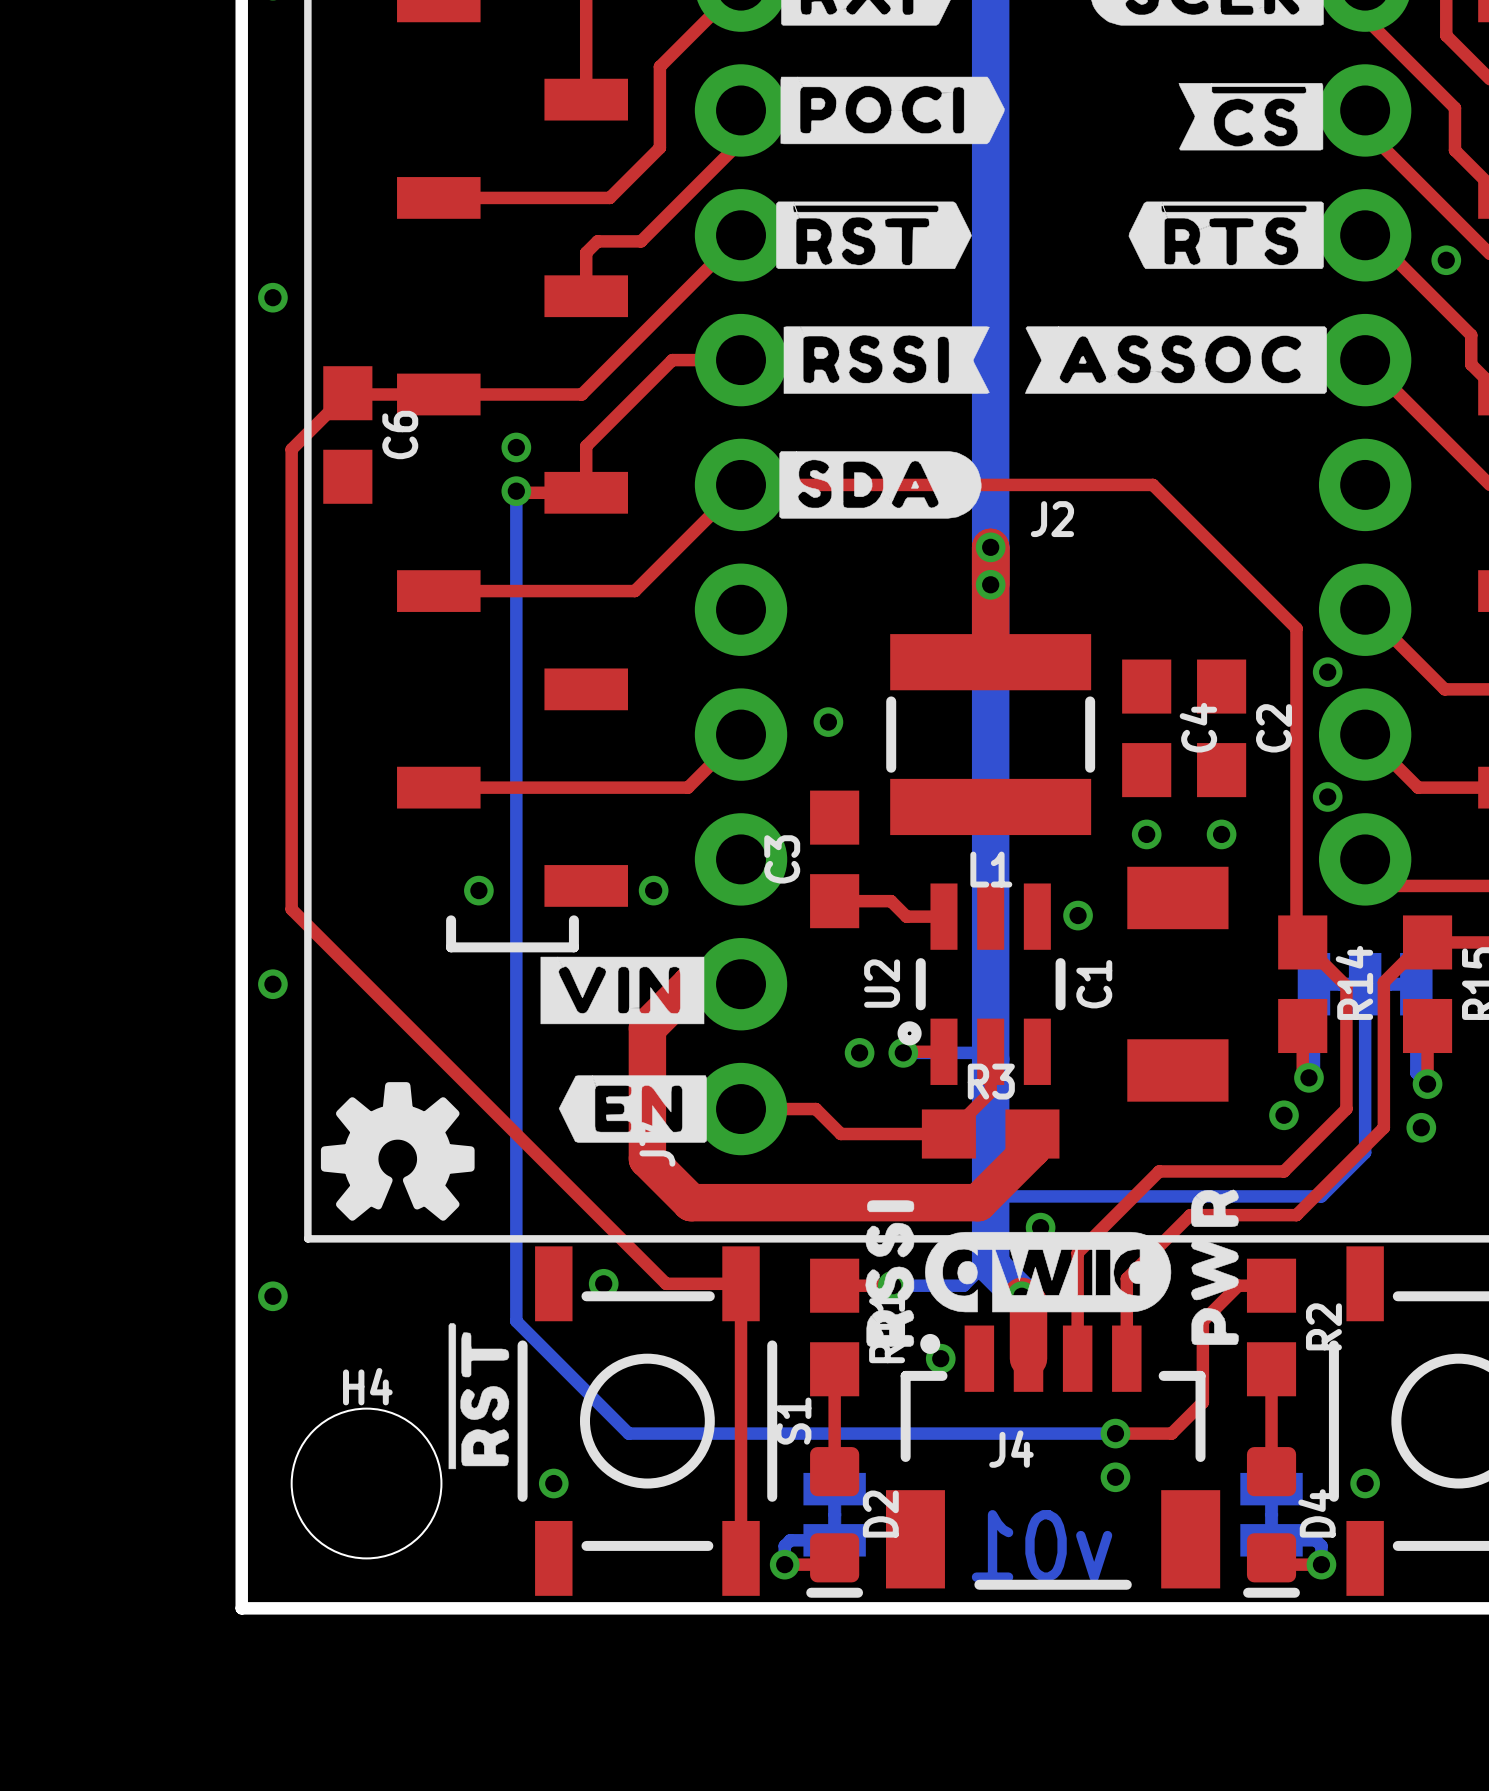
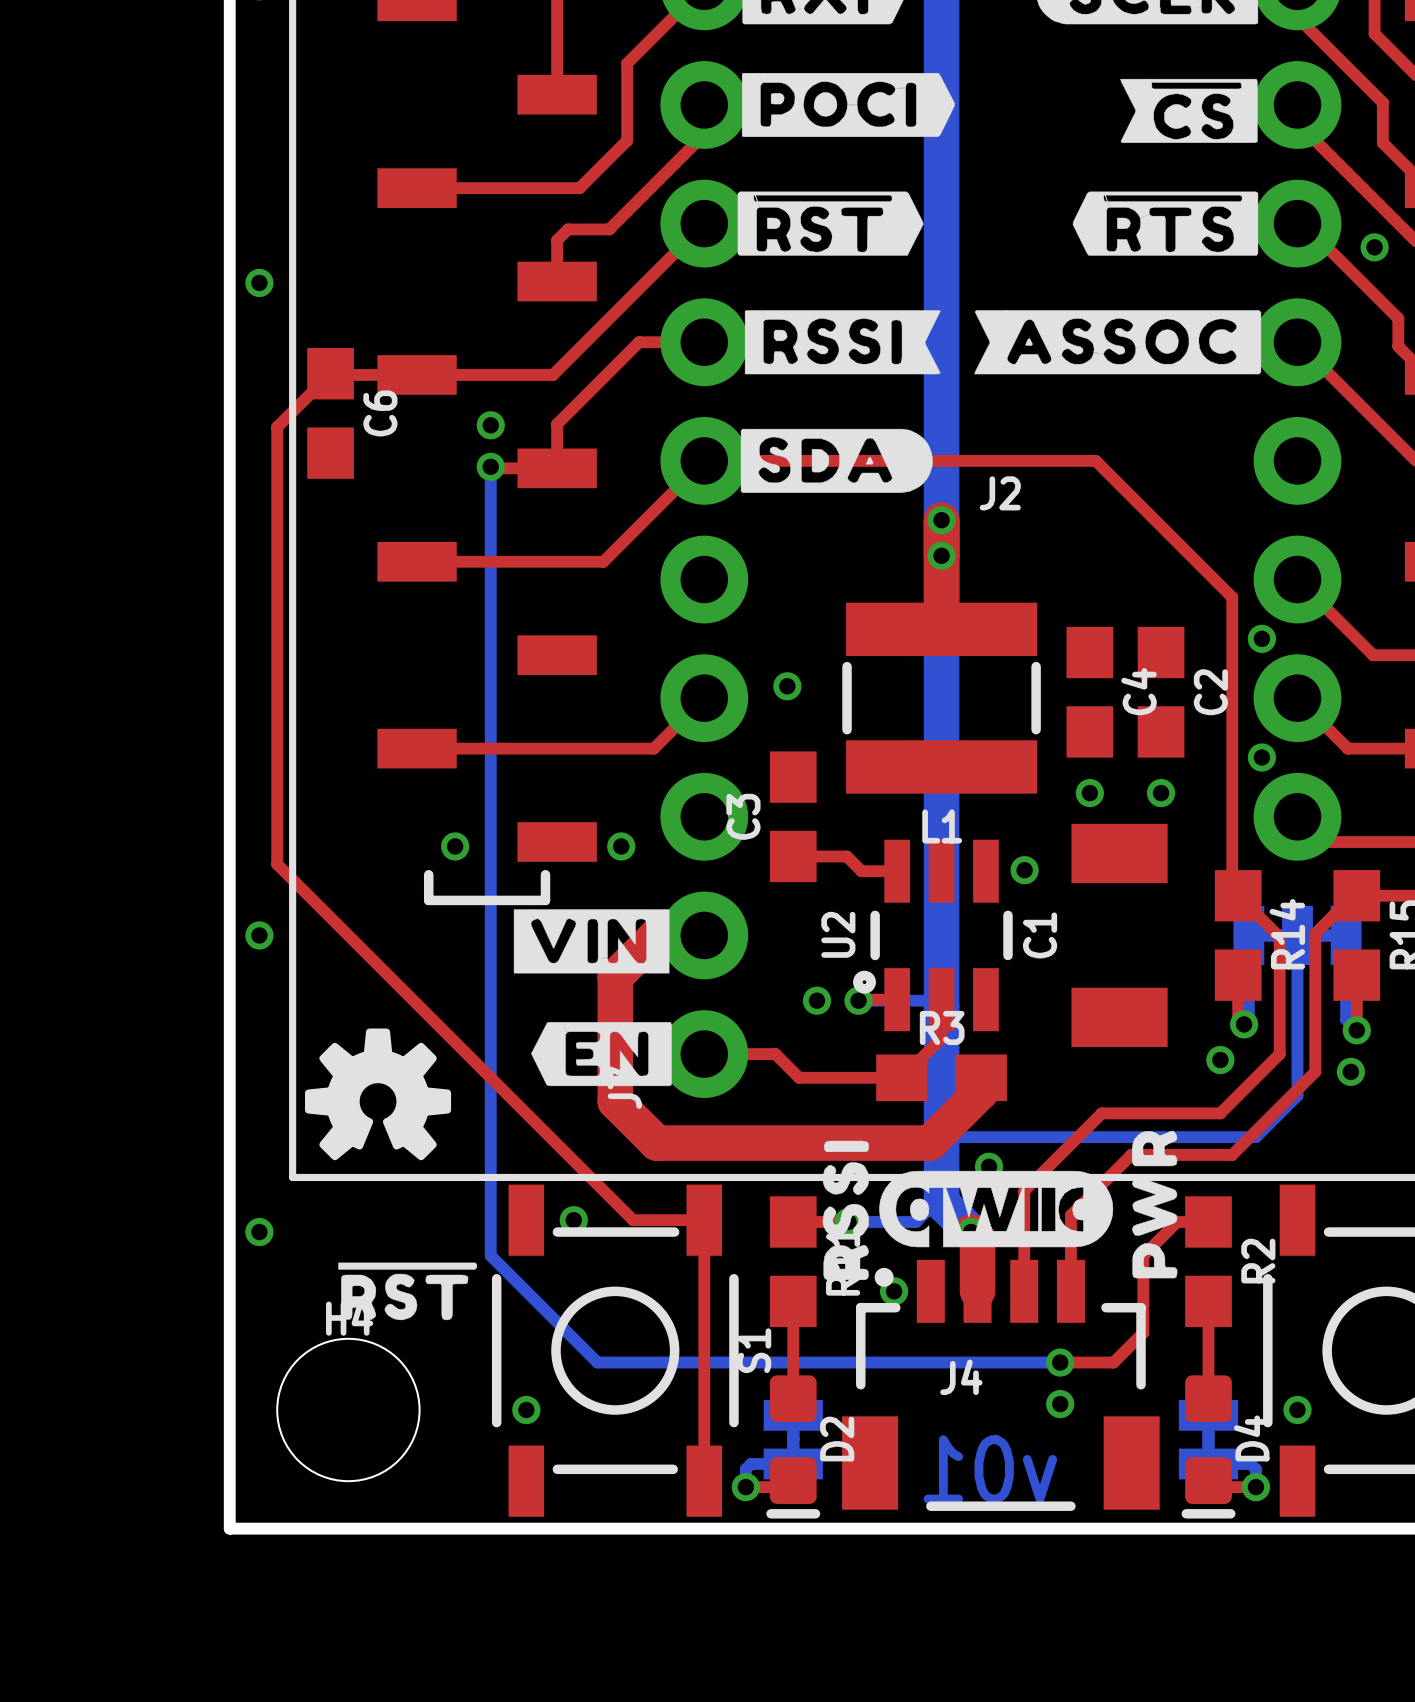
drawing: [448, 1323, 510, 1470] -> none
drawing: none -> [338, 1262, 478, 1321]

